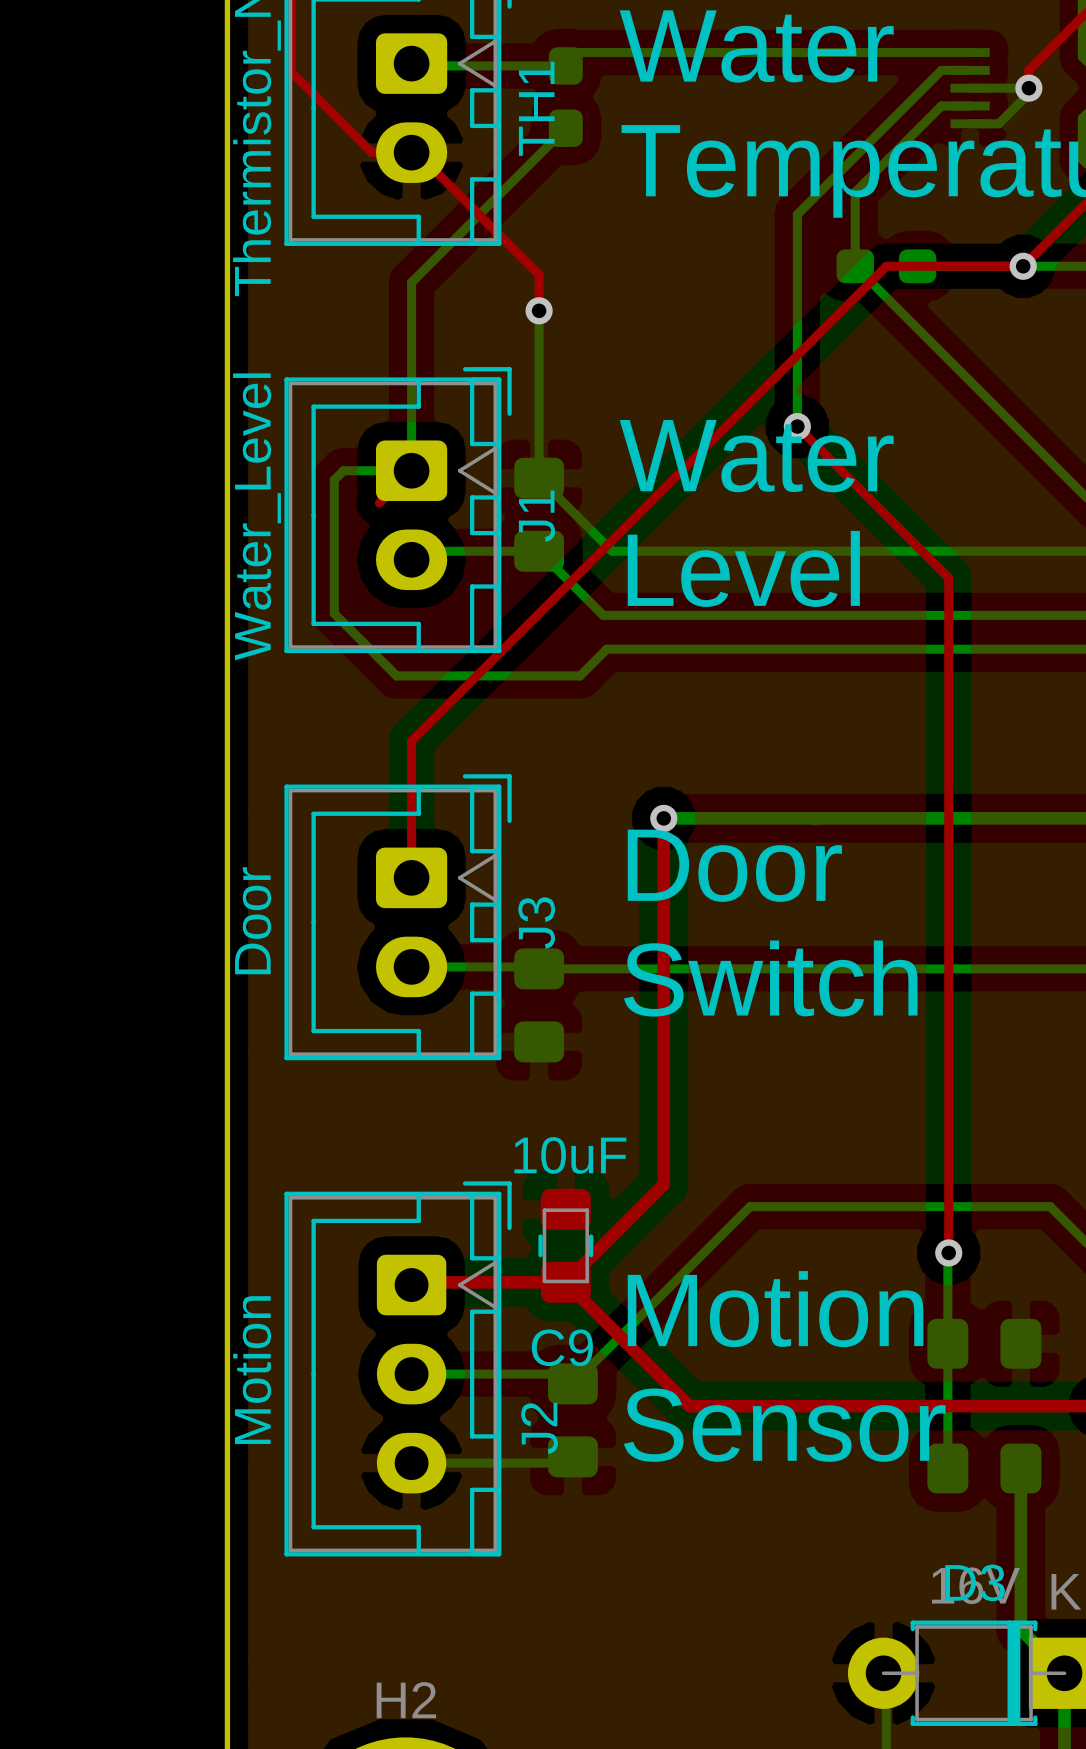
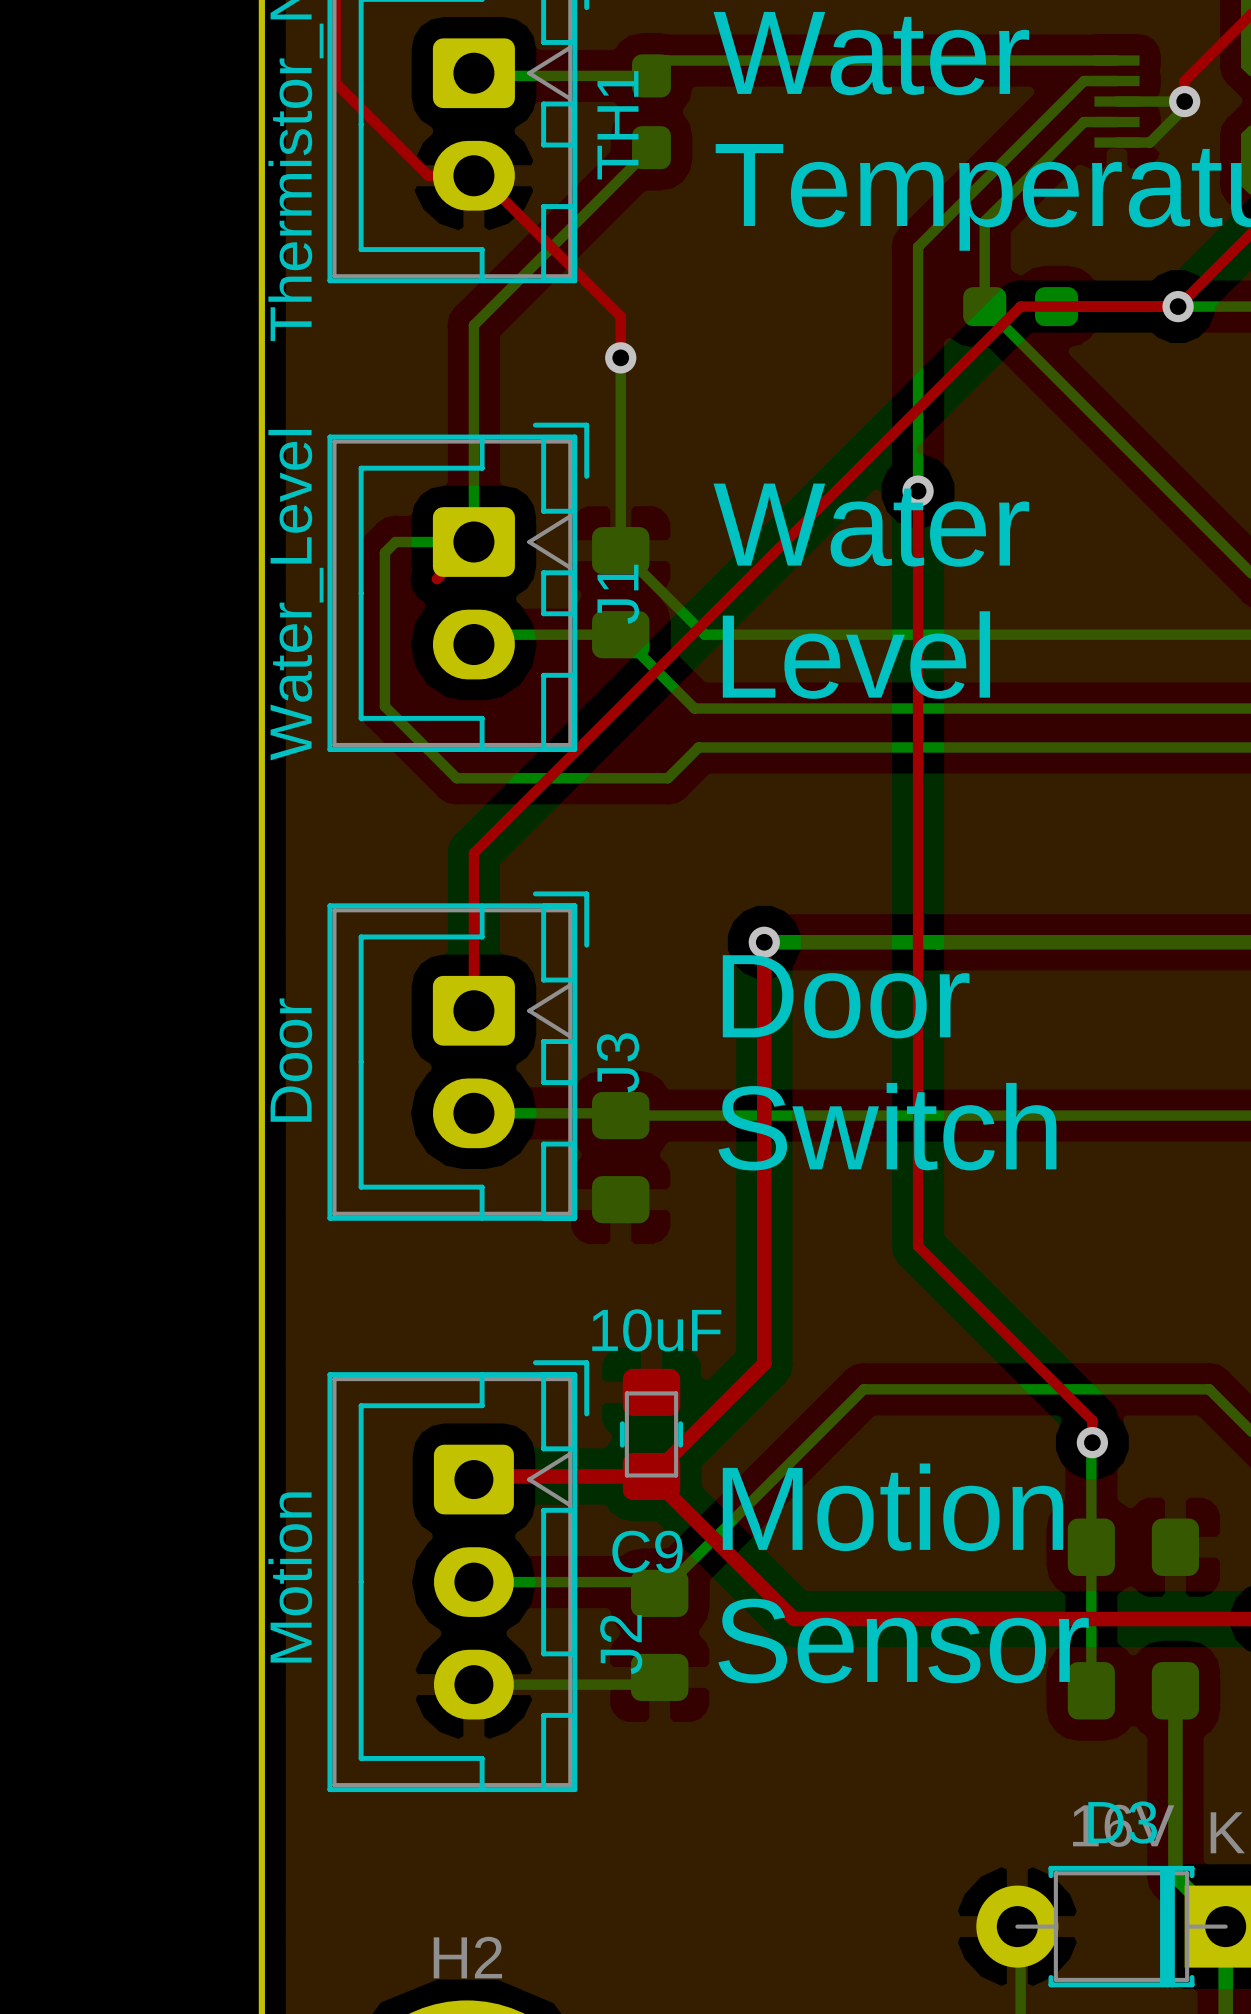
top track: (797, 426) (948, 577) (948, 1233) -> (918, 491) (918, 1246) (1092, 1420)

